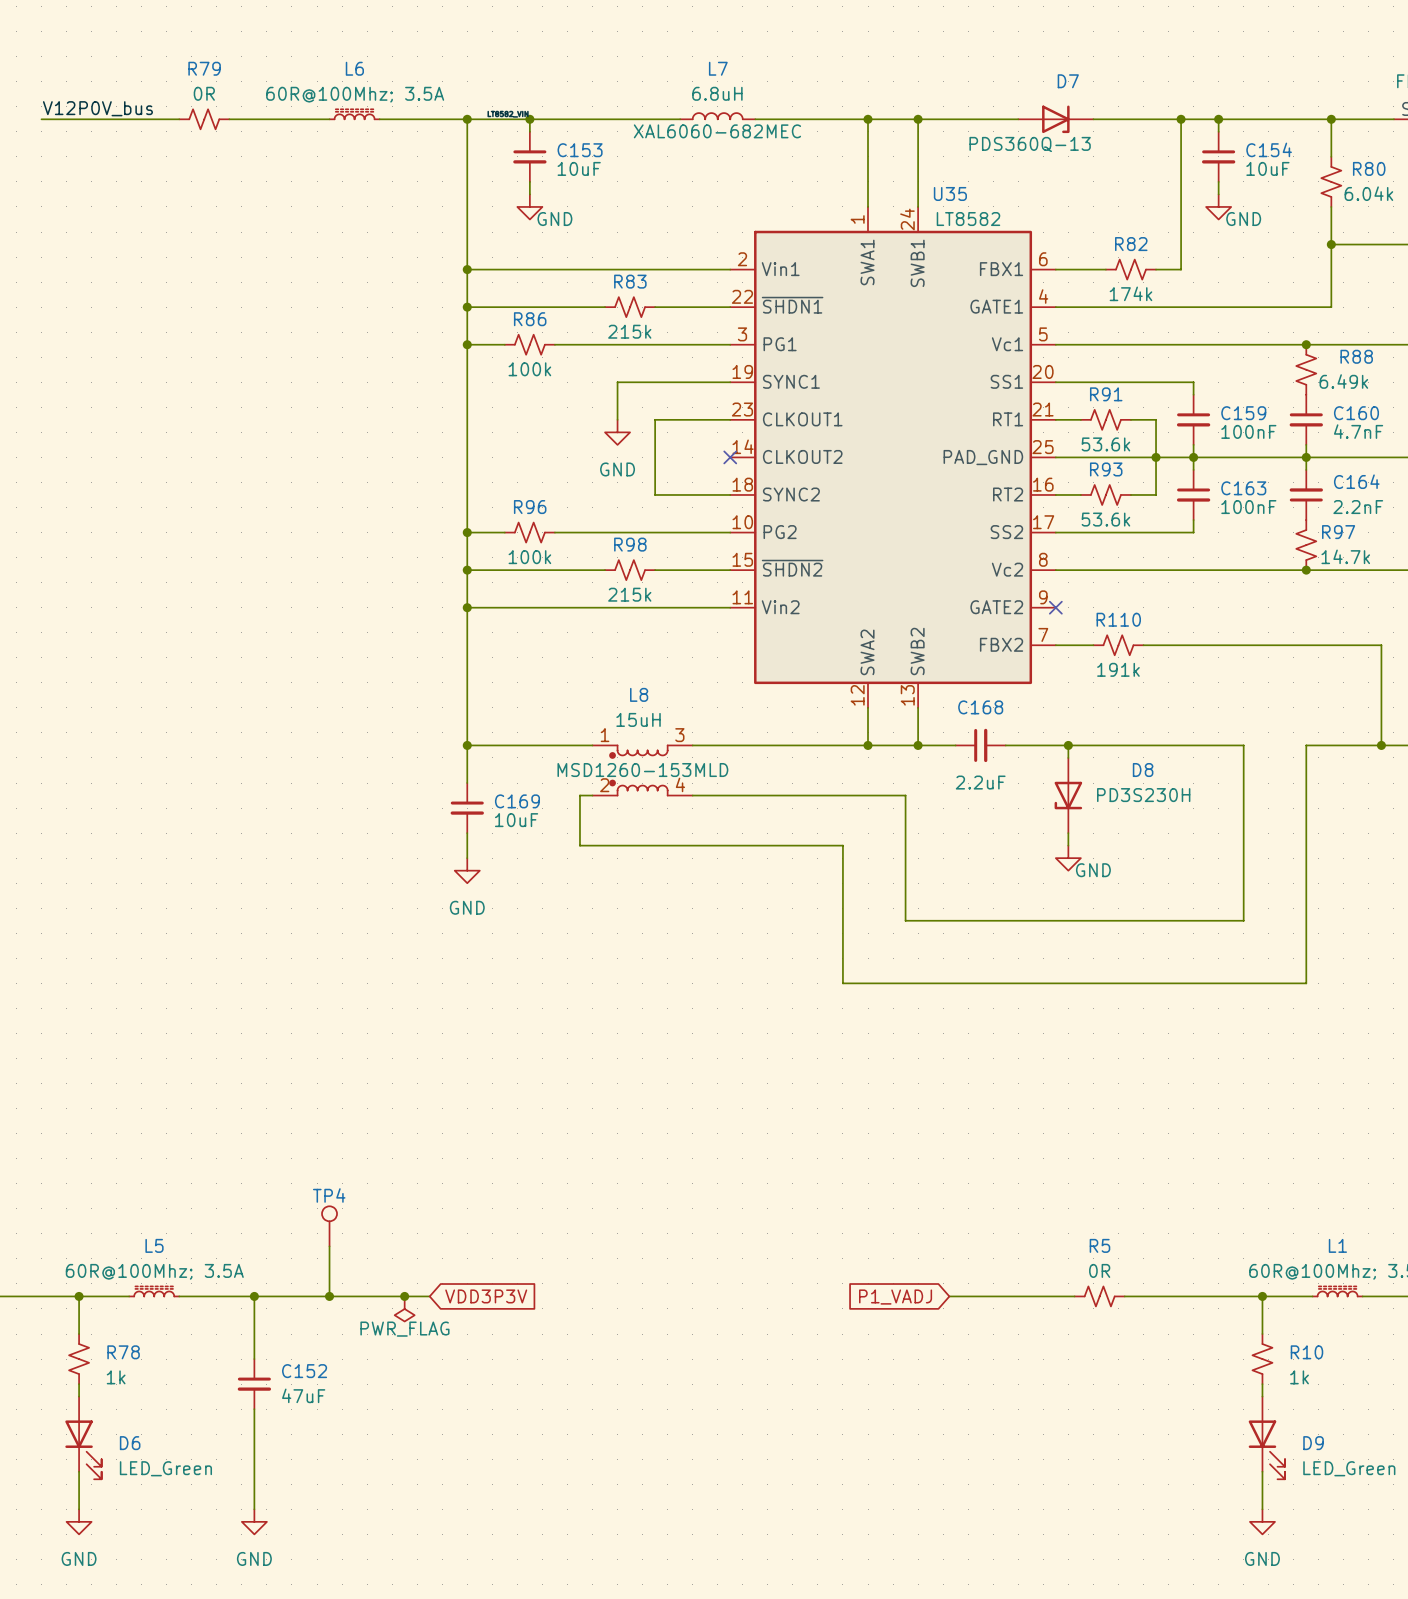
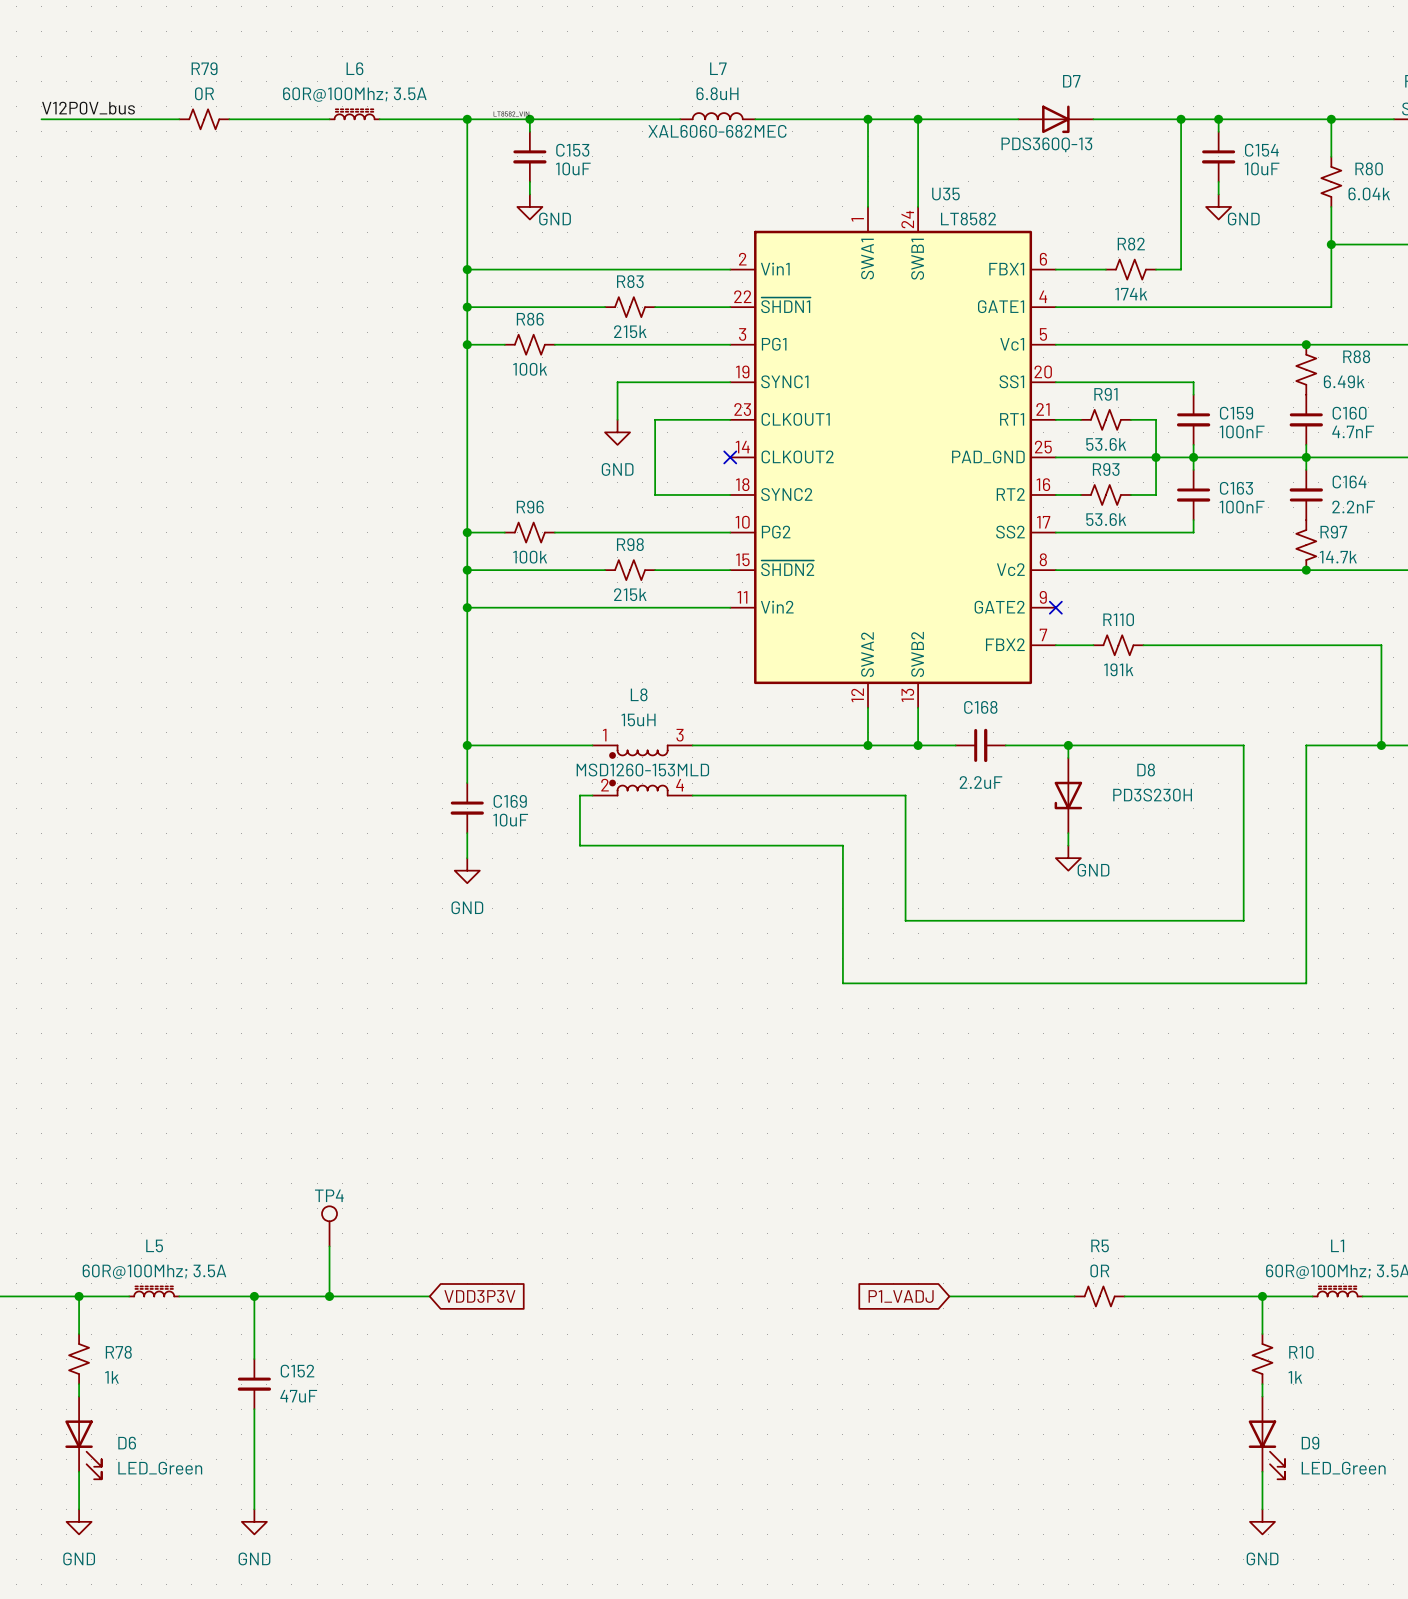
junction: (404, 1296) -> none
power symbol: PWR_FLAG (404, 1308) -> none

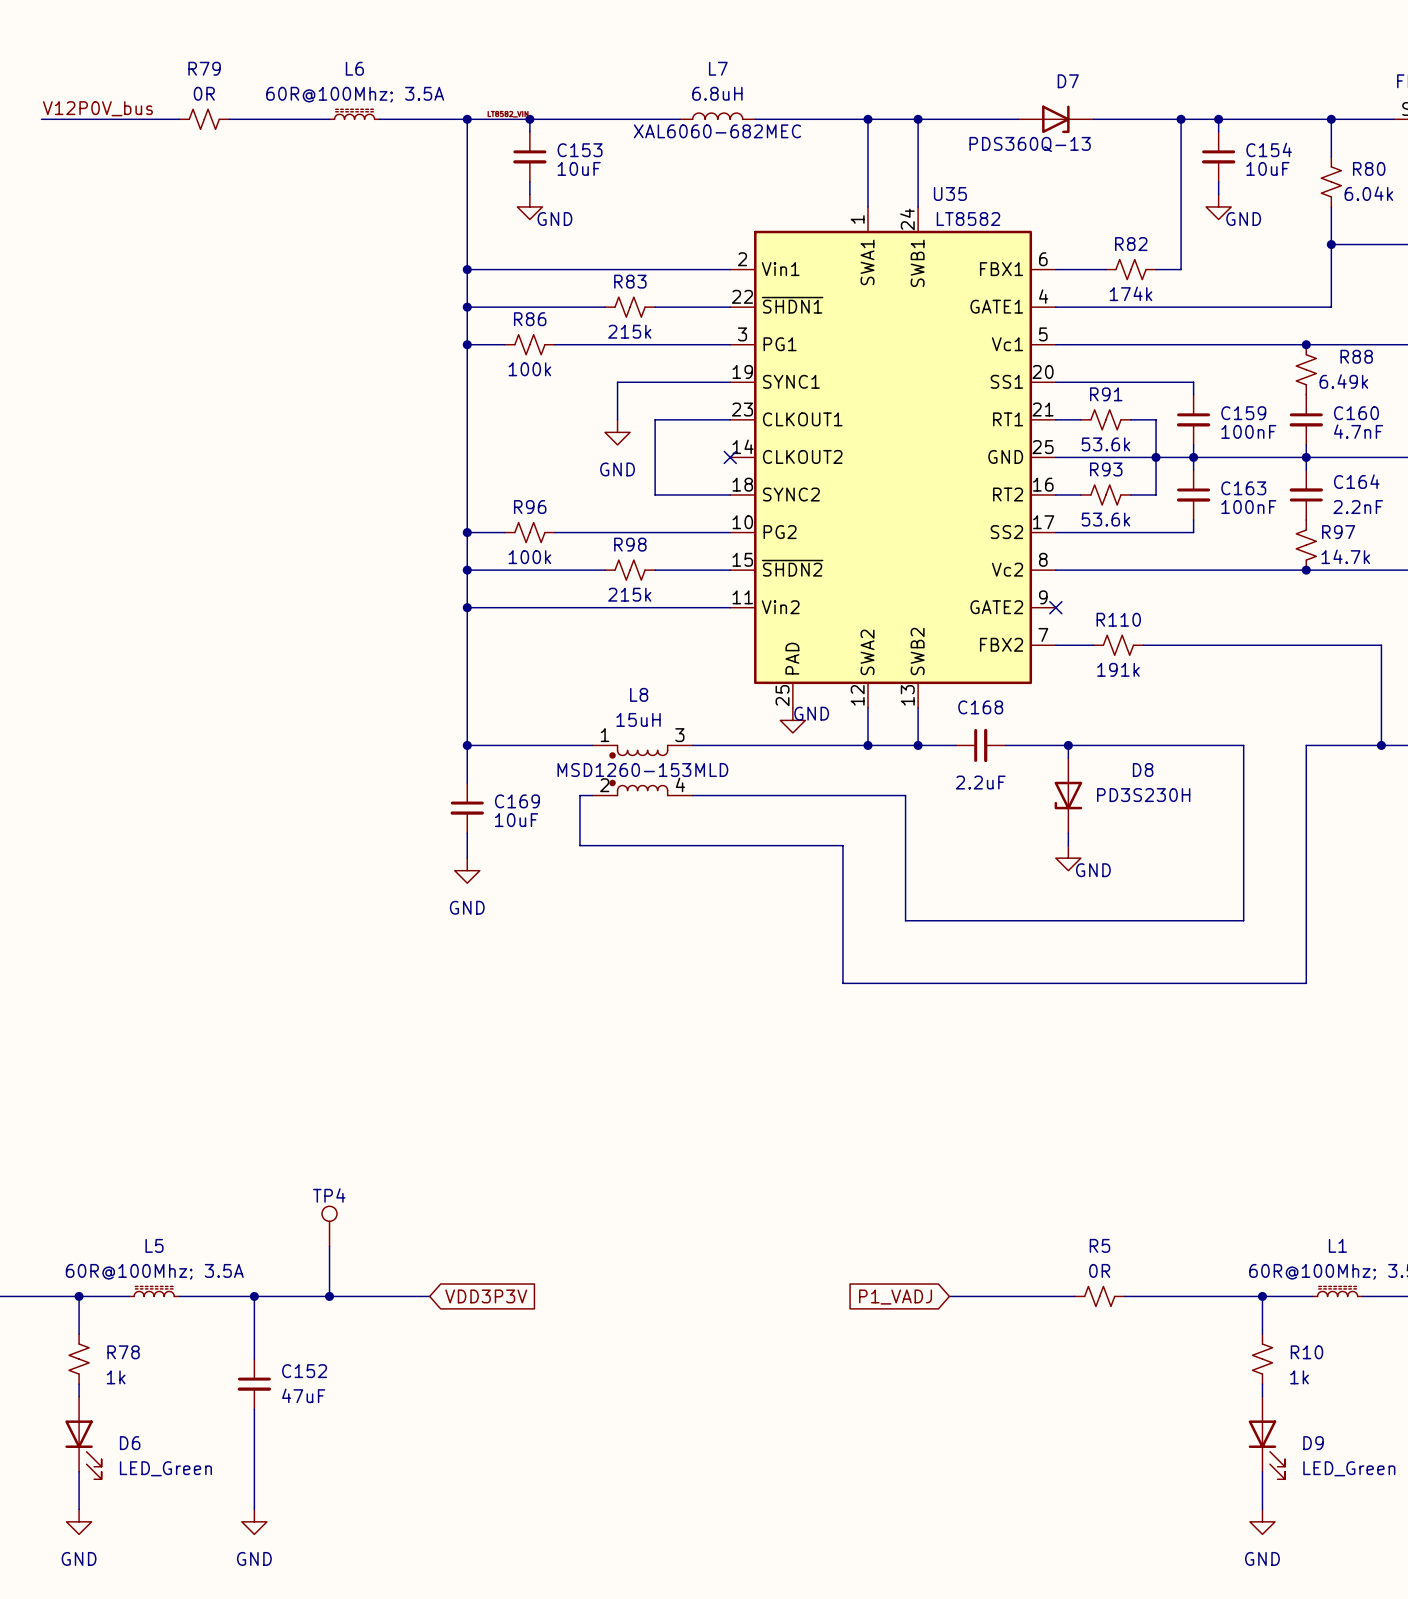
U35 symbol: [730, 206, 1056, 708] -> [730, 206, 1056, 708]
power symbol: none -> GND (792, 720)

